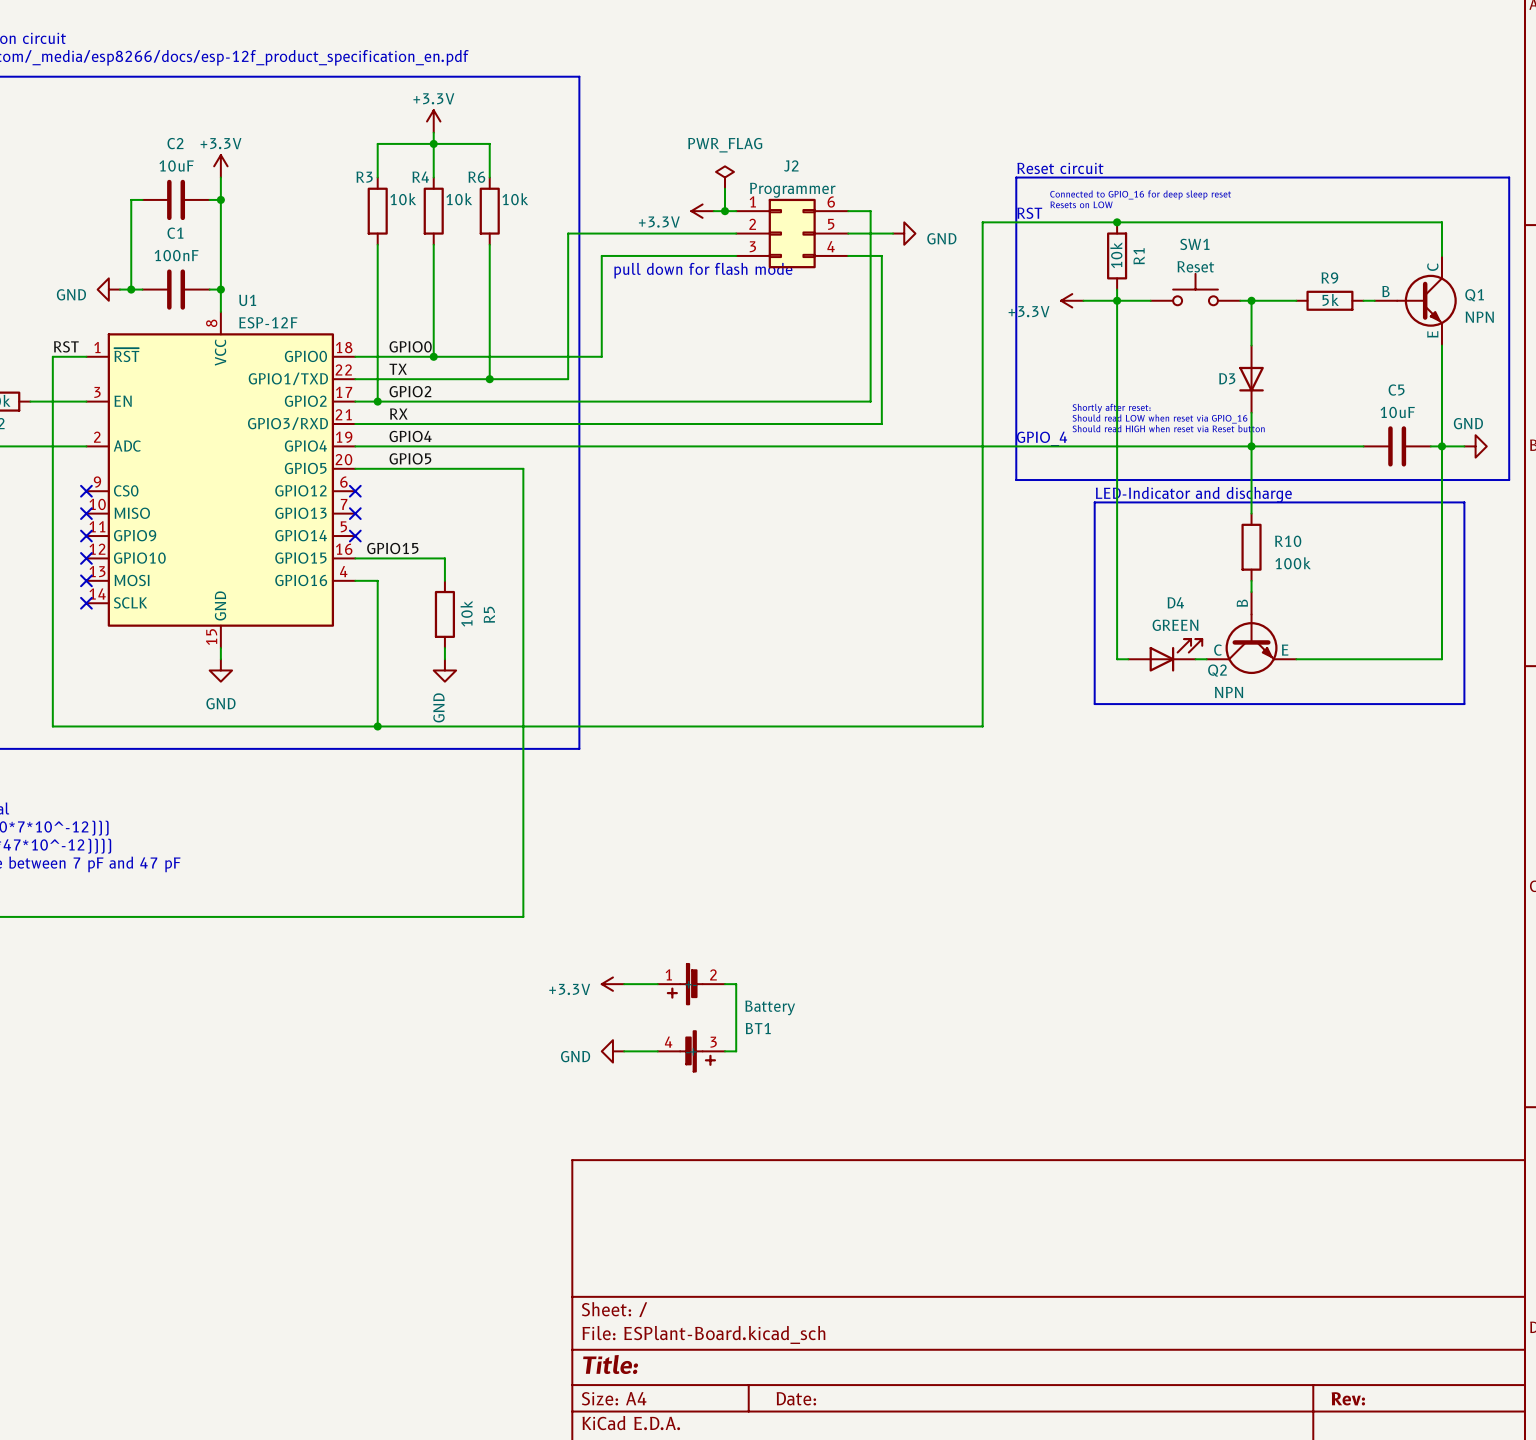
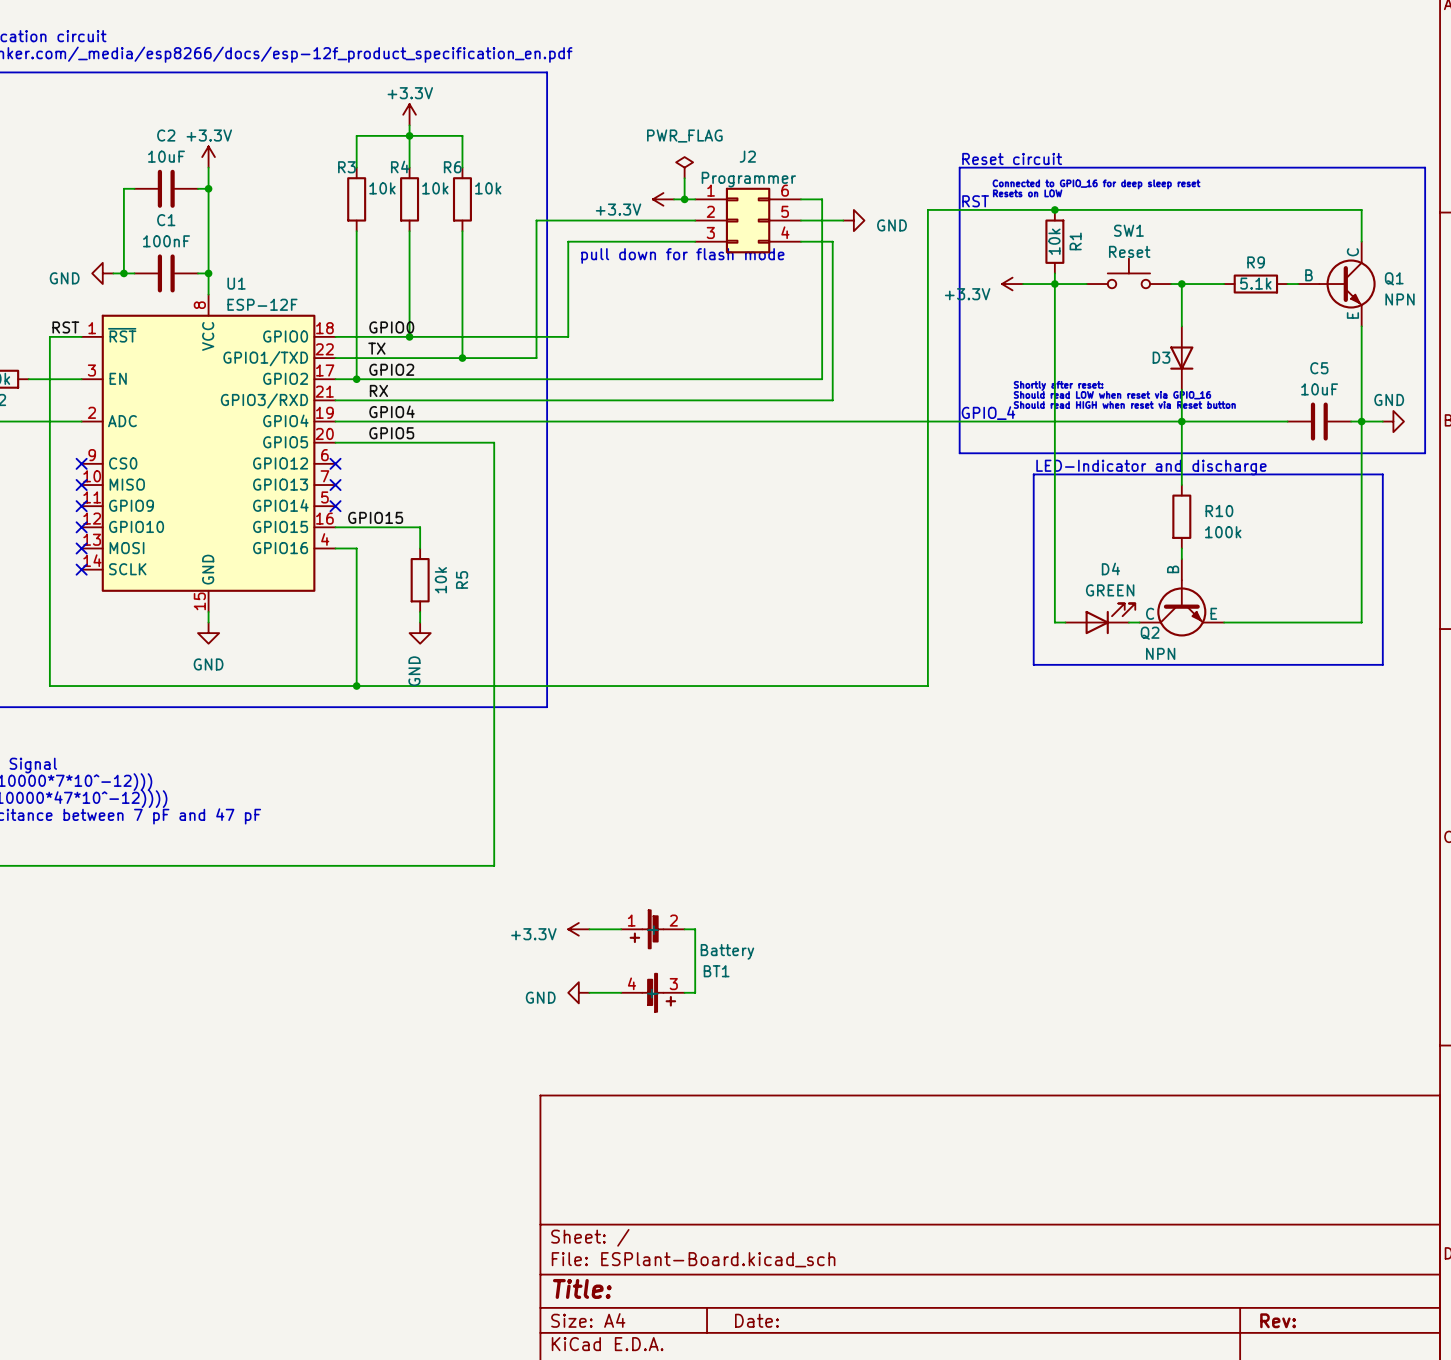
R9 value: 5k (1330, 299) -> 5.1k (1255, 283)

